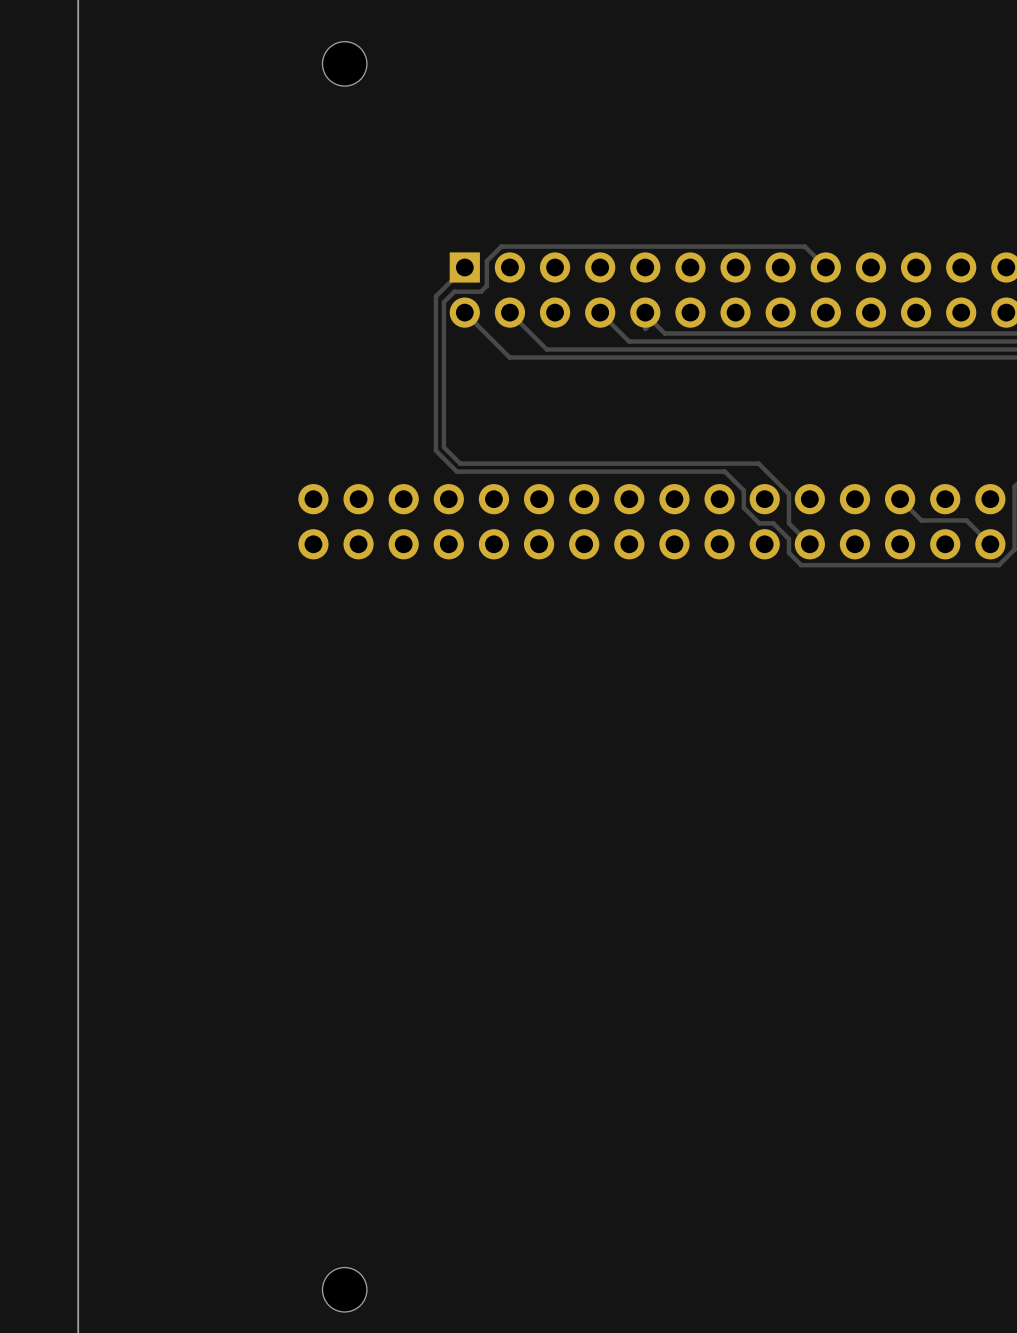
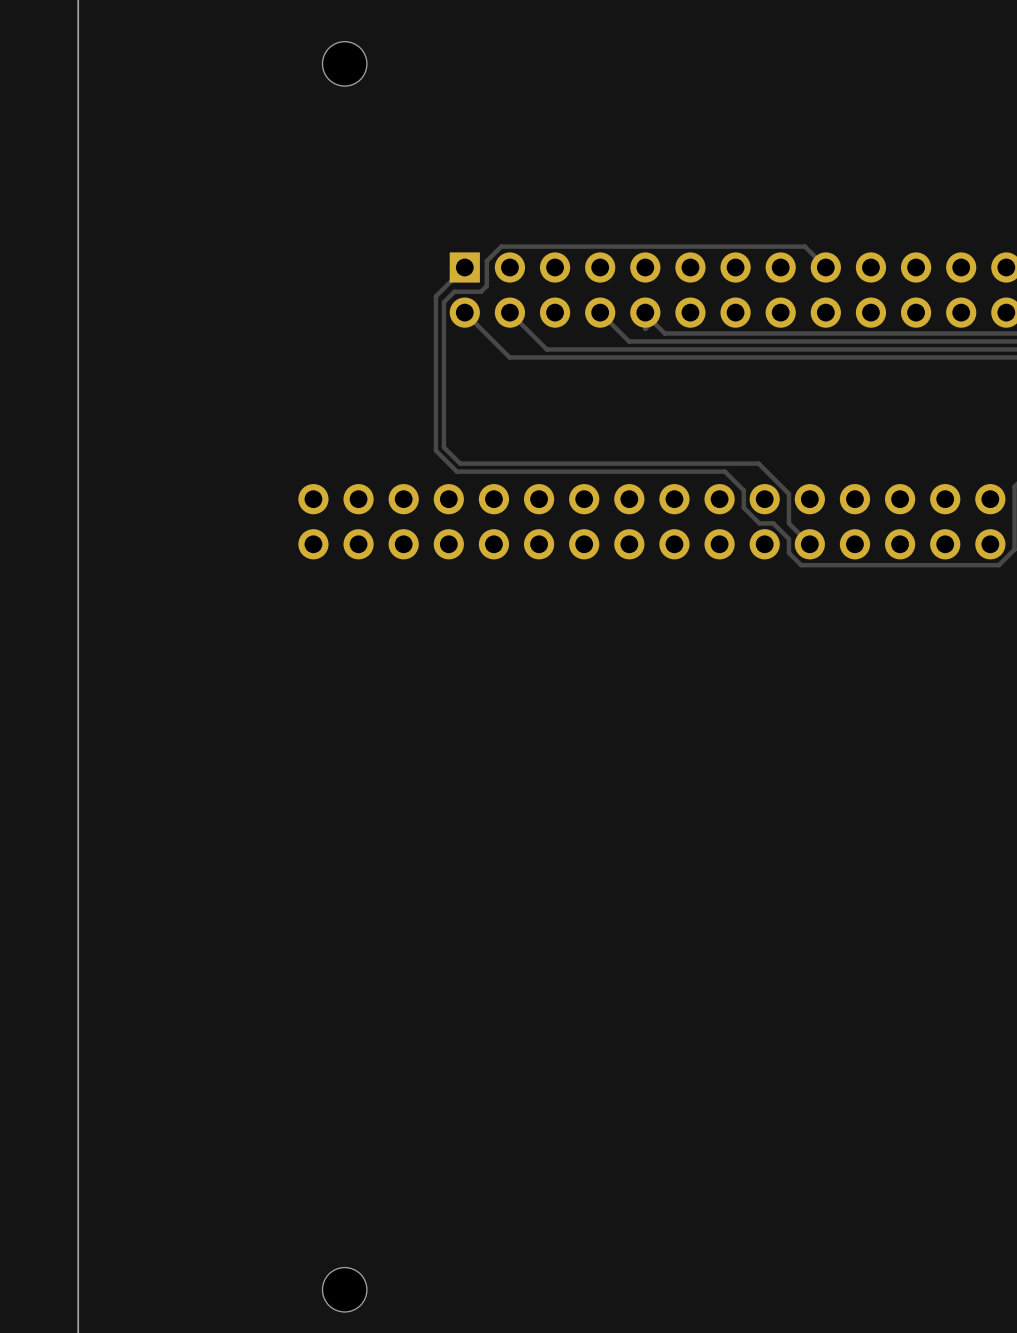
track: (900, 499) (921, 520) (966, 520) (990, 544) -> none

